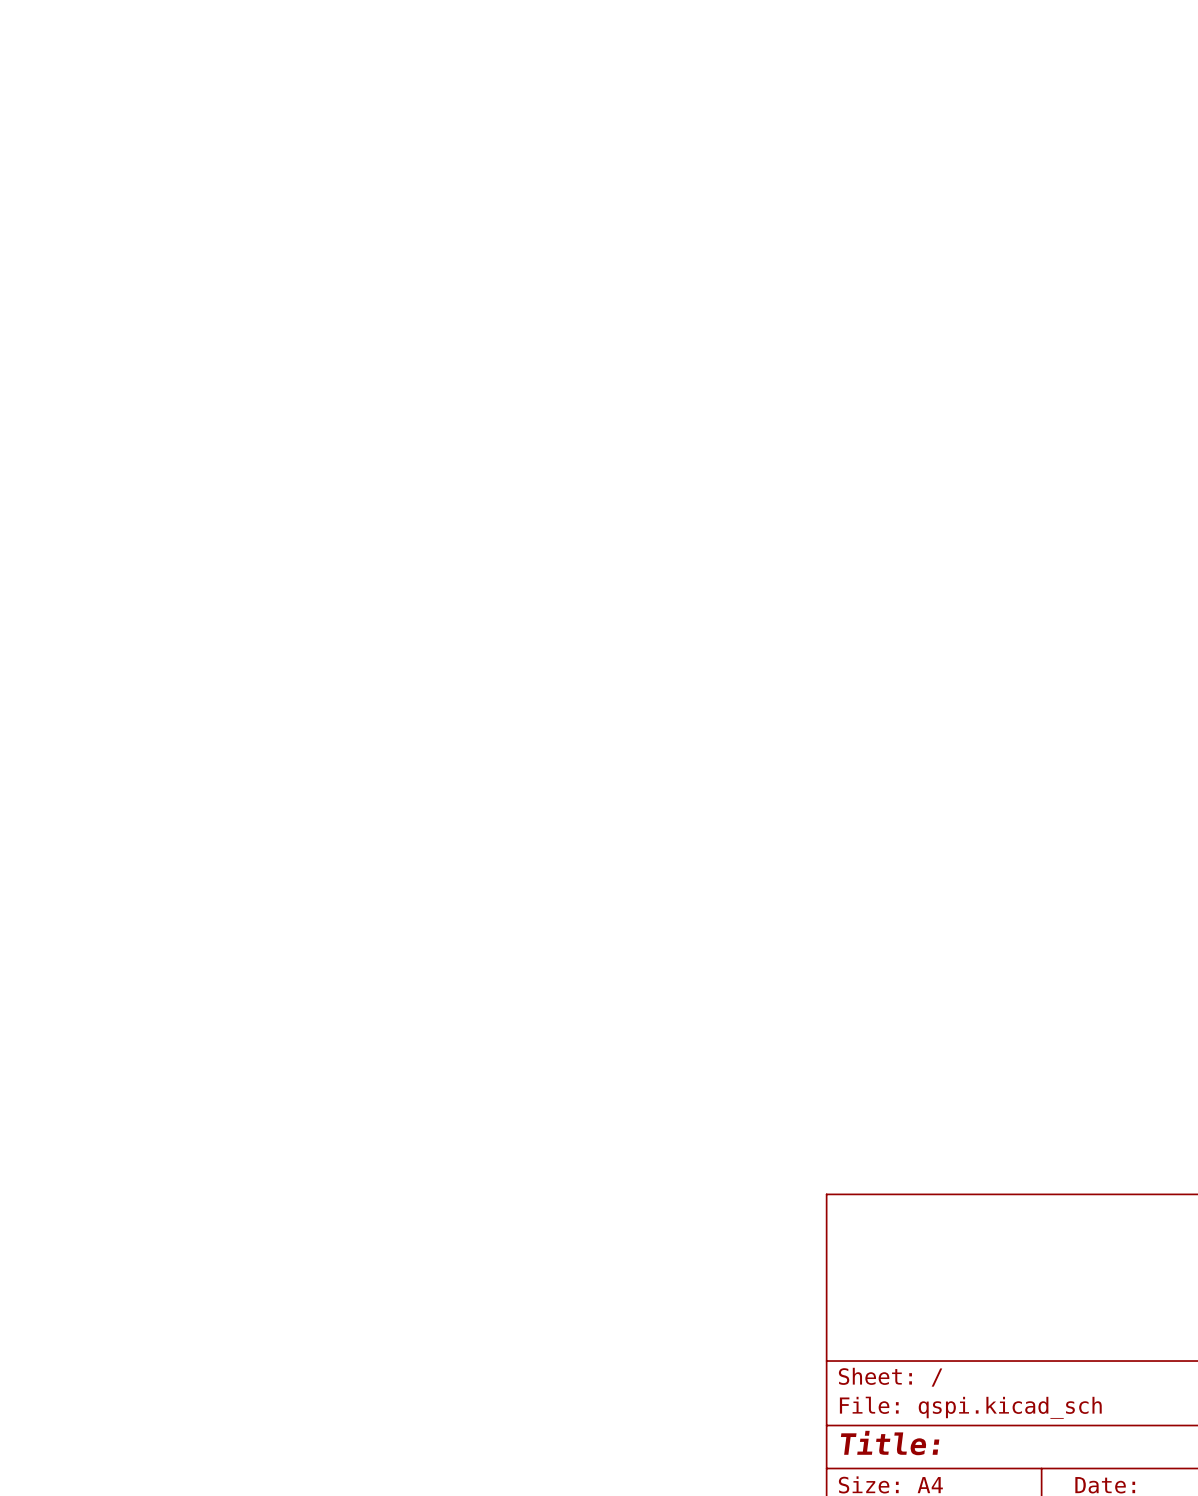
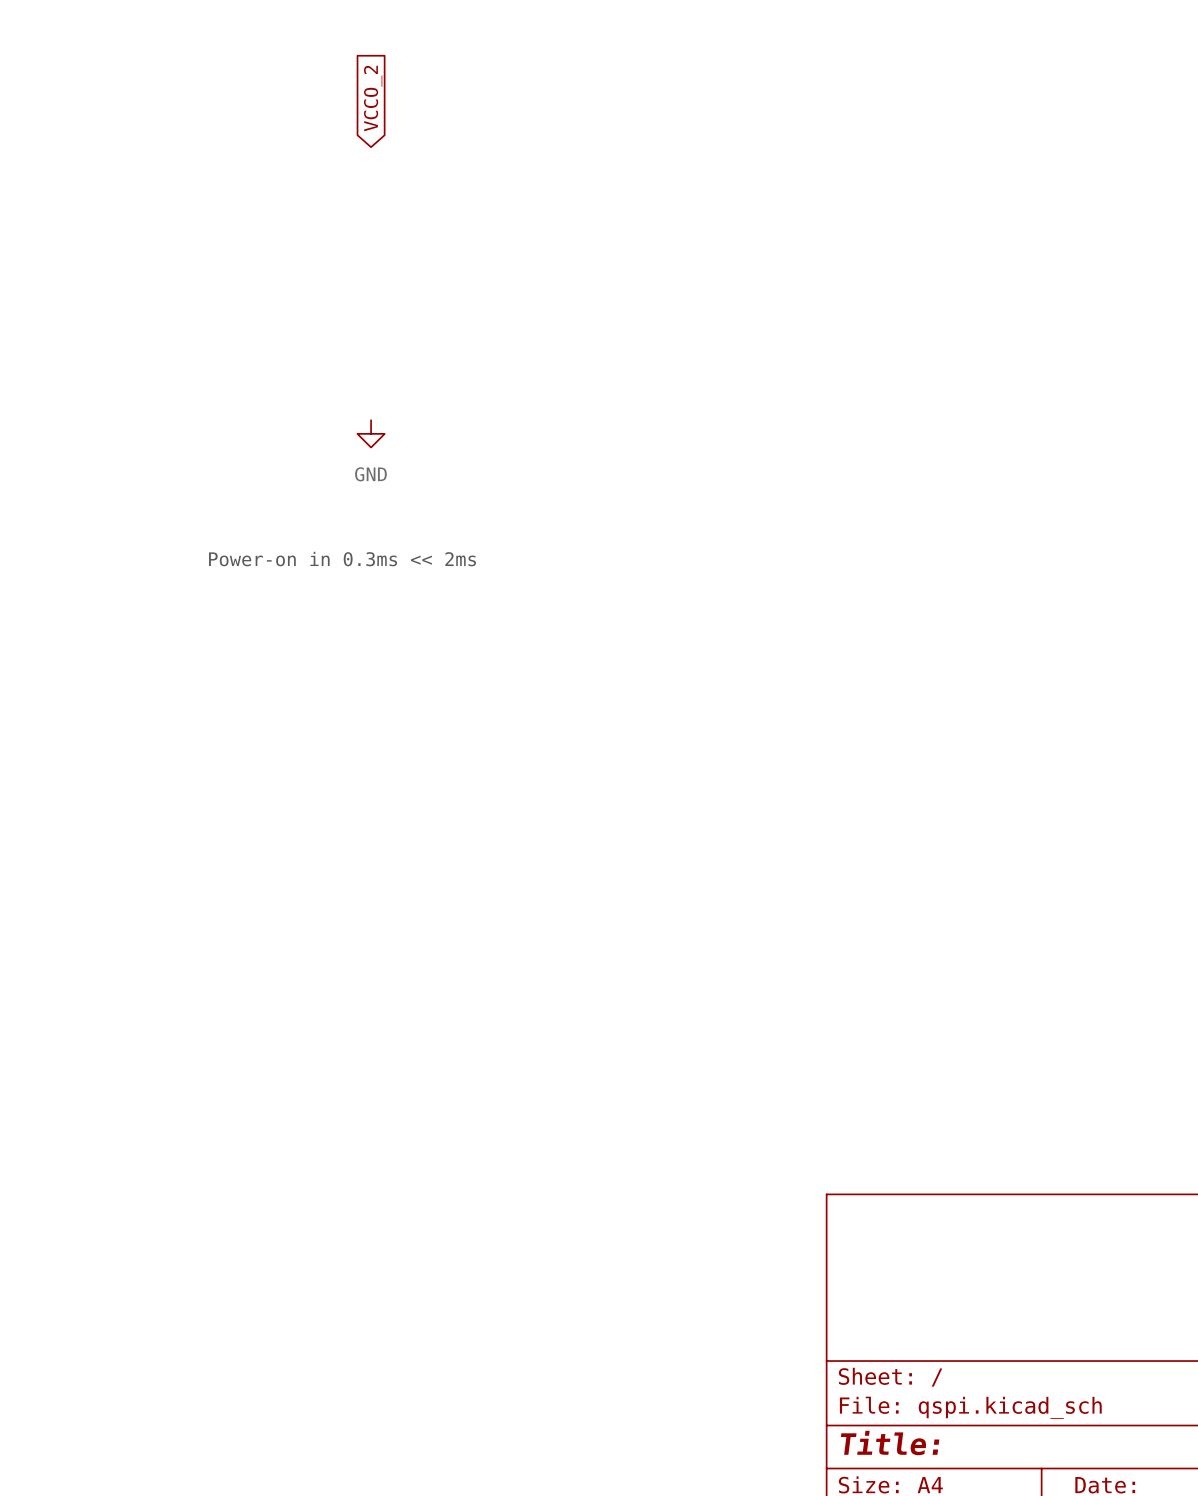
global label: none -> VCCO_2 (373, 98)
power symbol: none -> GND (371, 433)
text: none -> Power-on in 0.3ms << 2ms (342, 559)

